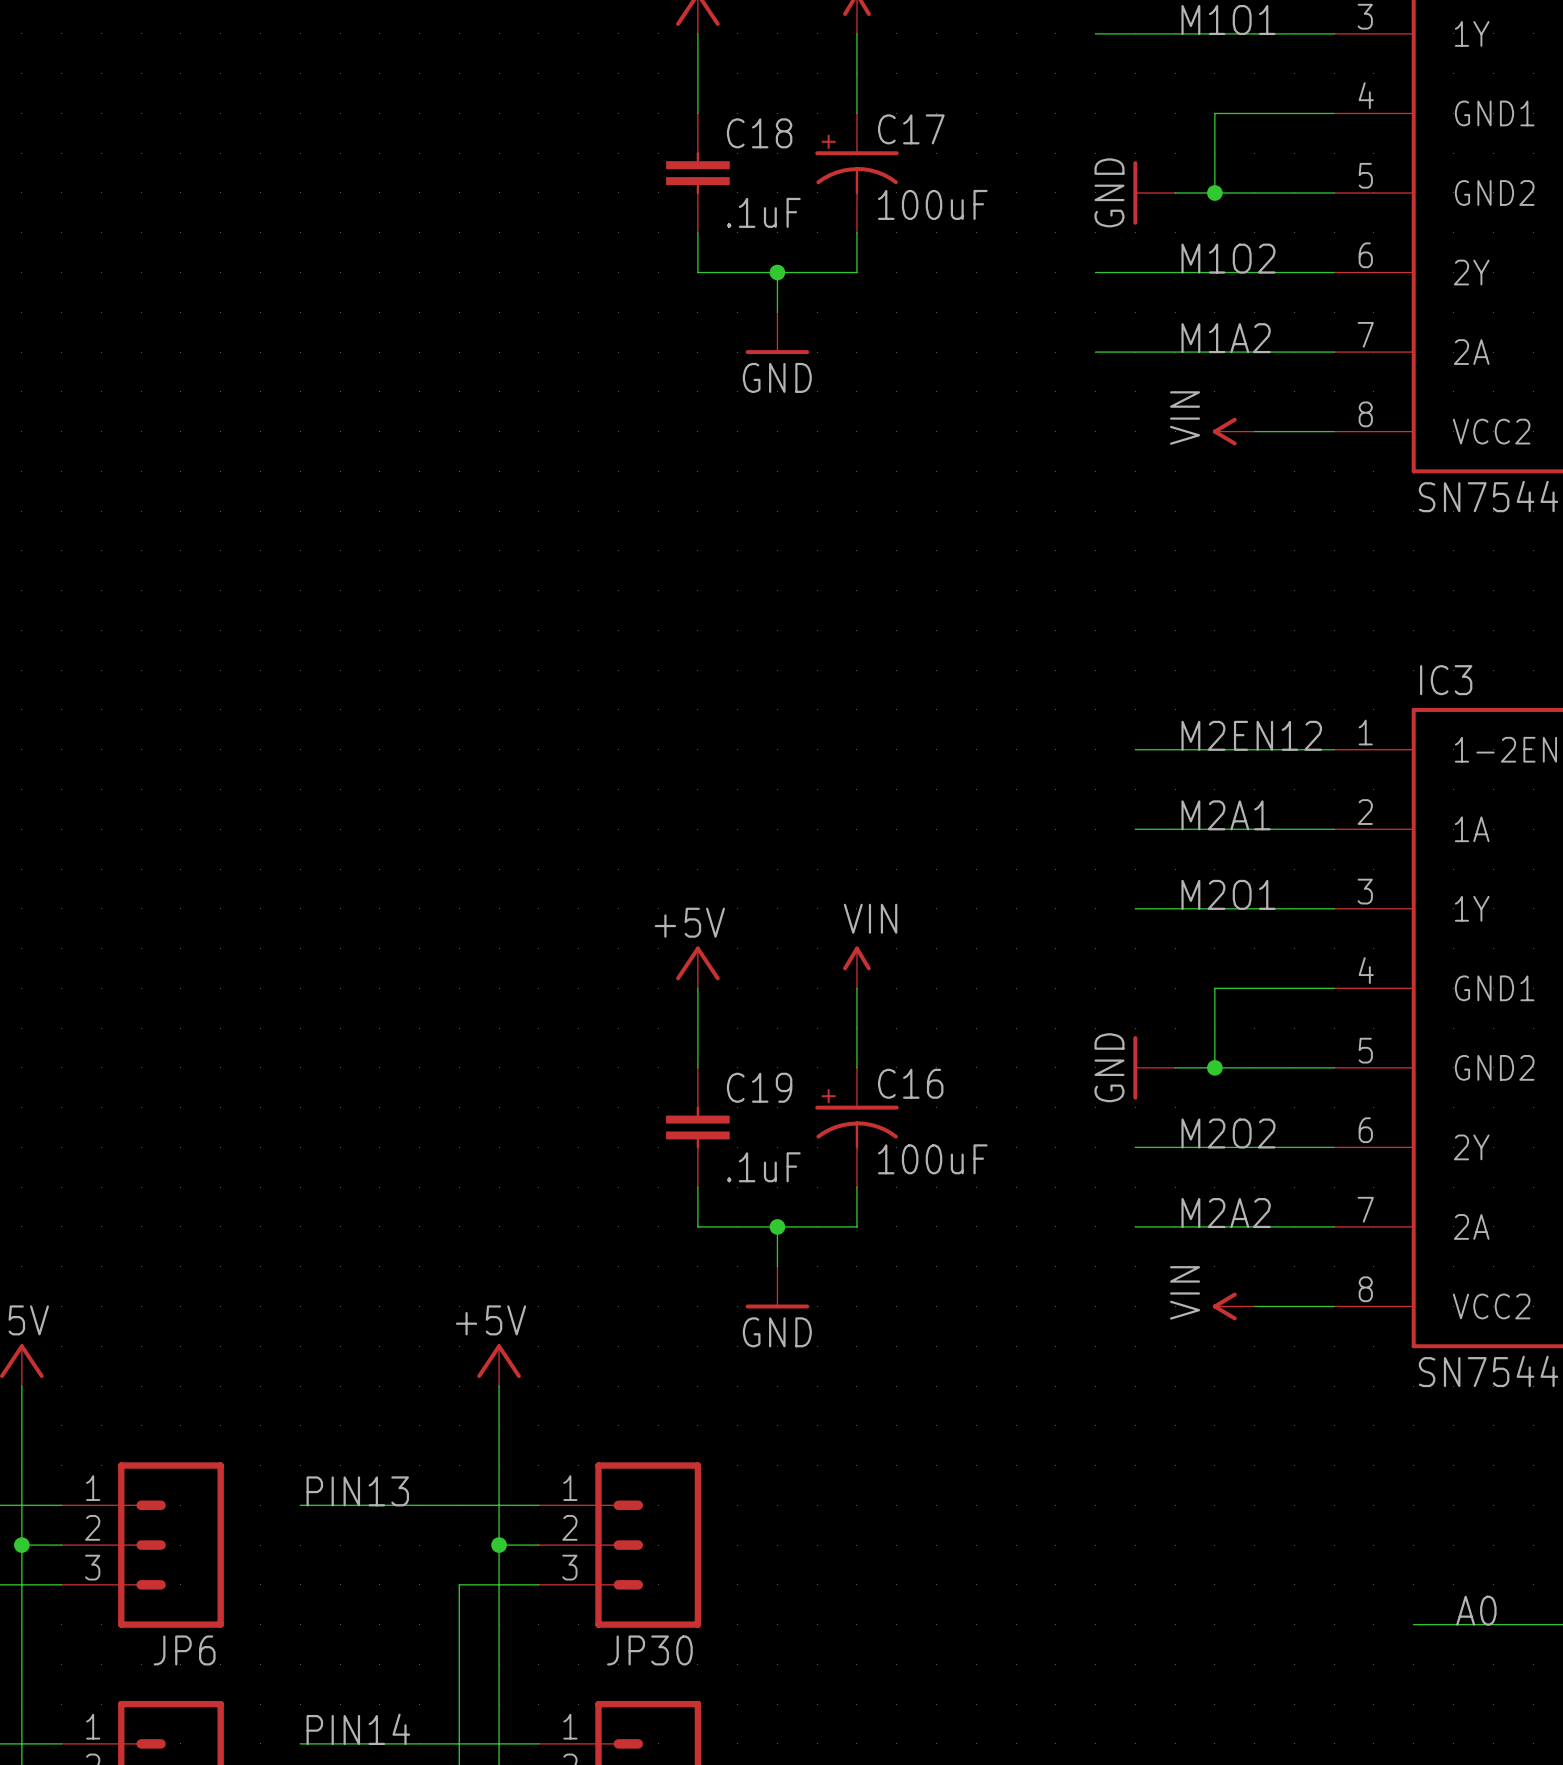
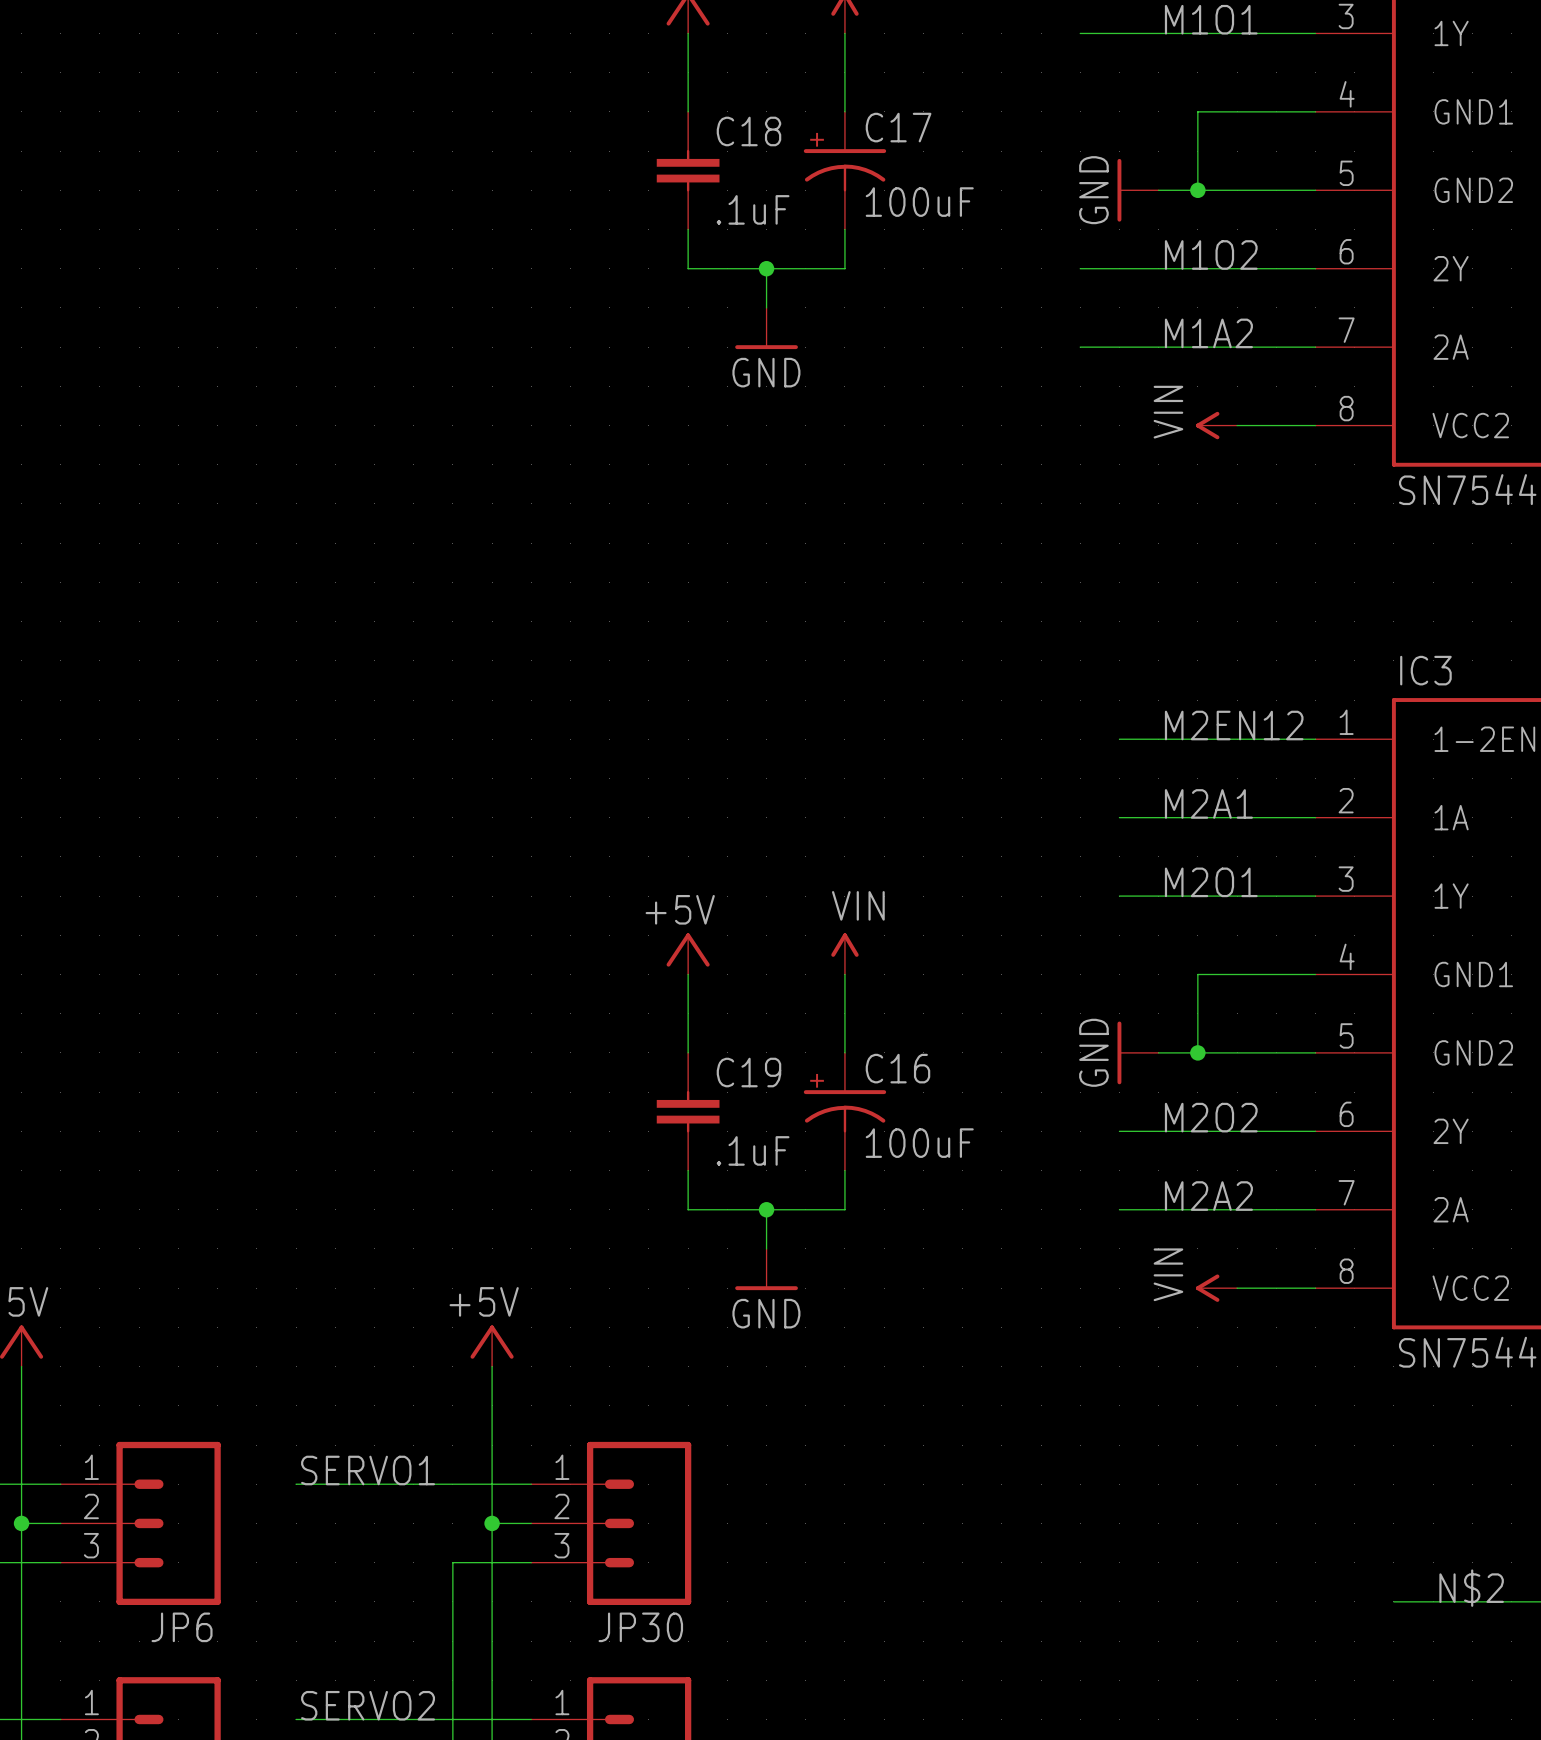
label: PIN13 (357, 1491) -> SERVO1 (368, 1470)
label: A0 (1476, 1610) -> N$2 (1471, 1588)
label: PIN14 (358, 1729) -> SERVO2 (368, 1705)

